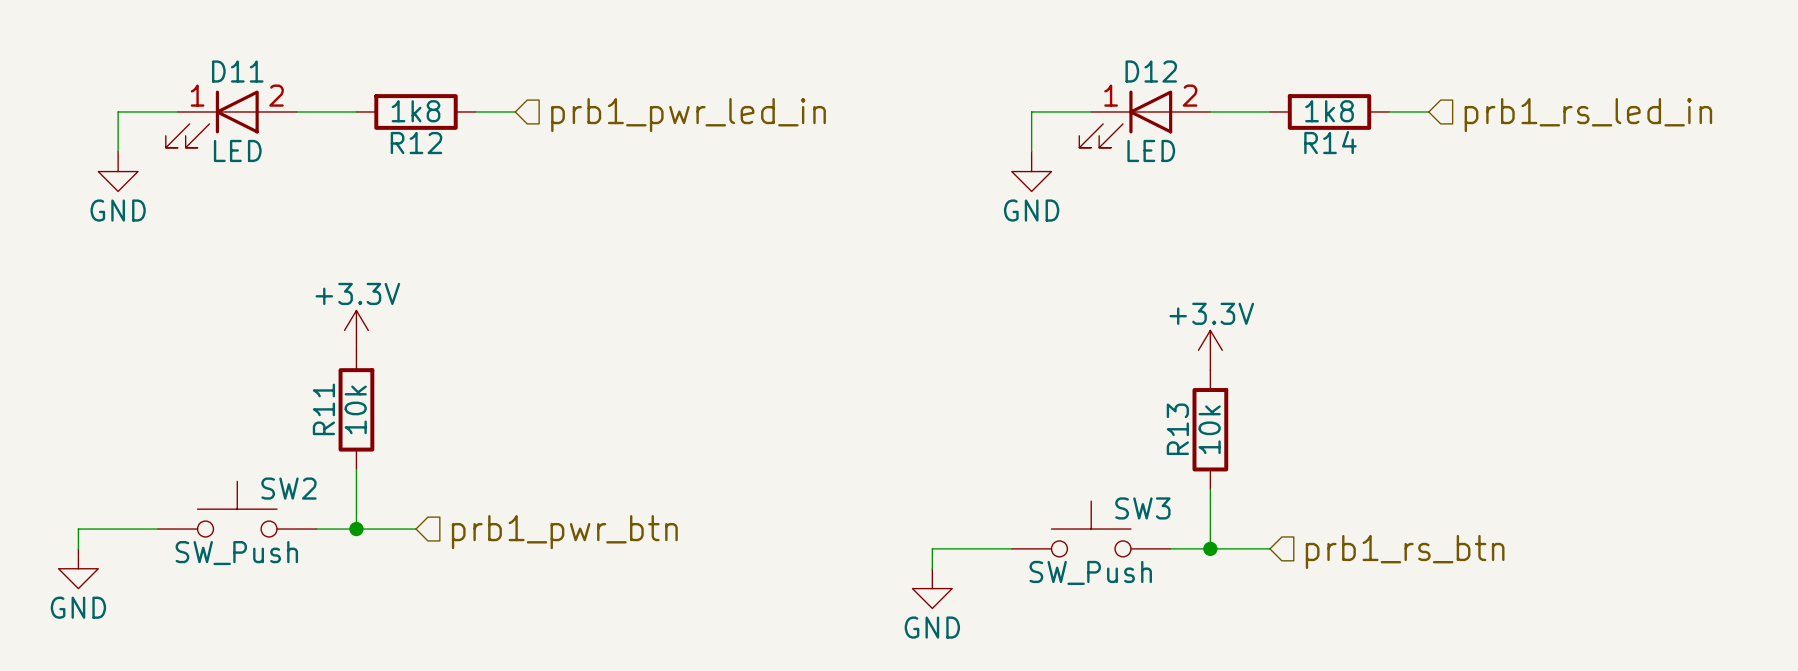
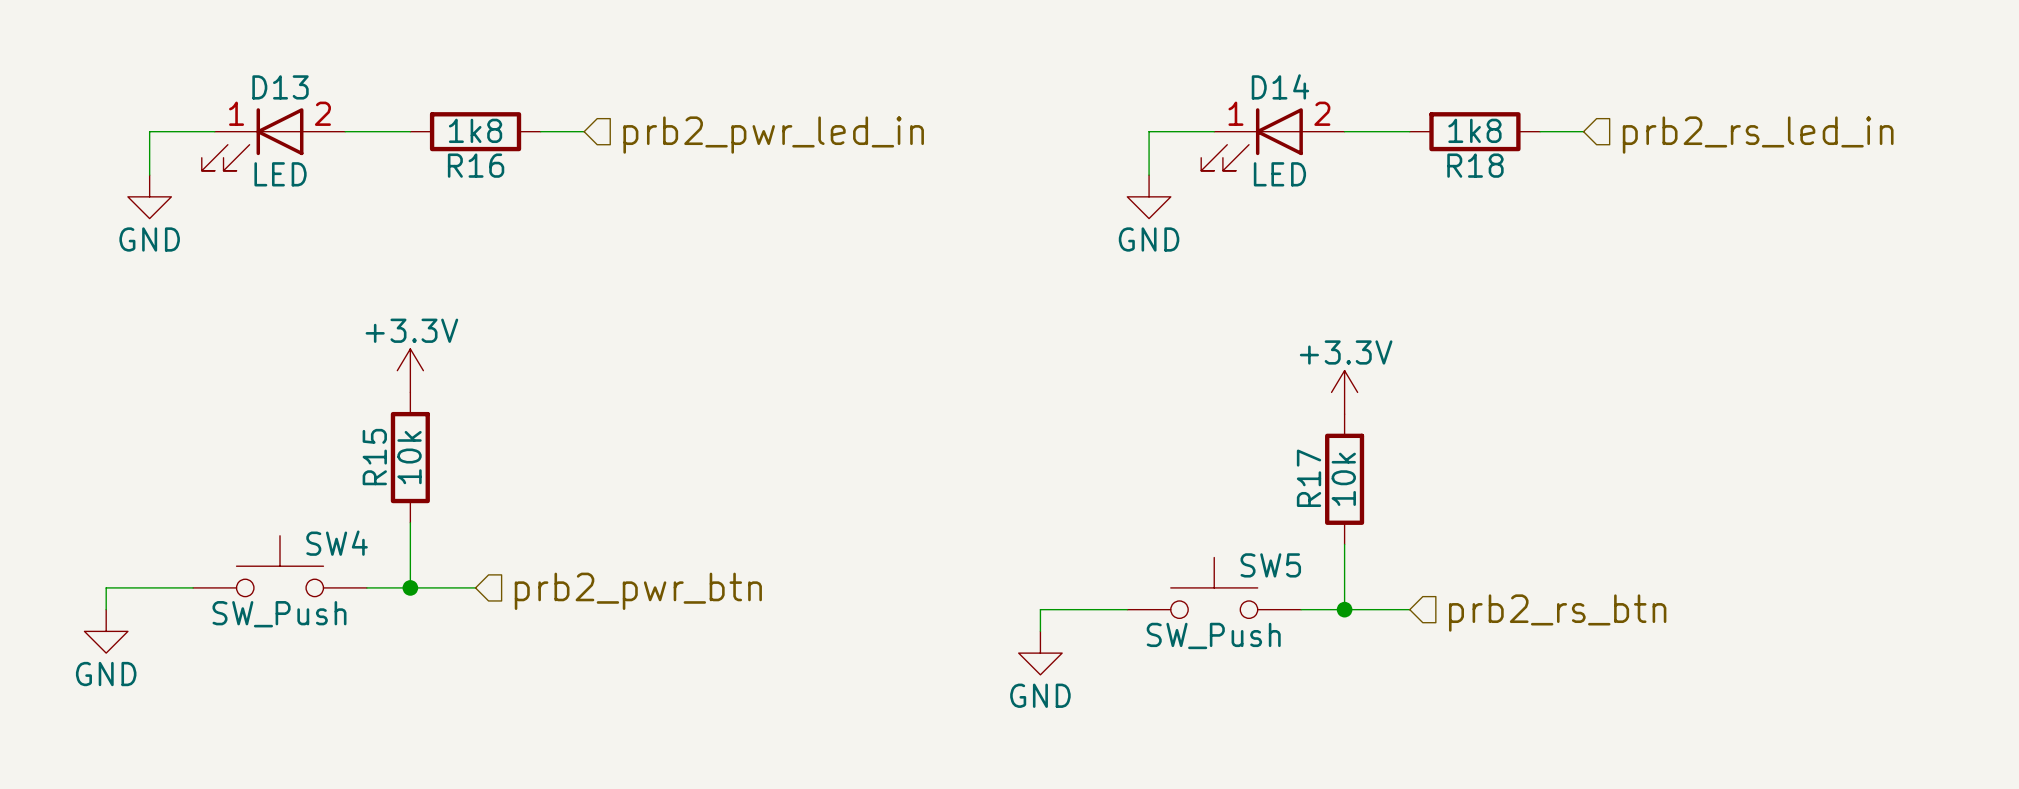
D11 name: D11 (237, 71) -> D13 (280, 87)
D12 name: D12 (1151, 71) -> D14 (1280, 86)
hierarchical label: prb1_pwr_led_in (688, 115) -> prb2_pwr_led_in (773, 135)
hierarchical label: prb1_rs_led_in (1588, 115) -> prb2_rs_led_in (1758, 135)
R14 name: R14 (1330, 142) -> R18 (1475, 165)
R12 name: R12 (416, 143) -> R16 (476, 165)
R11 name: R11 (323, 409) -> R15 (374, 457)
R13 name: R13 (1177, 429) -> R17 (1309, 478)
SW2 name: SW2 (288, 488) -> SW4 (337, 543)
SW3 name: SW3 (1142, 508) -> SW5 (1270, 565)
hierarchical label: prb1_pwr_btn (564, 532) -> prb2_pwr_btn (638, 591)
hierarchical label: prb1_rs_btn (1405, 551) -> prb2_rs_btn (1557, 613)

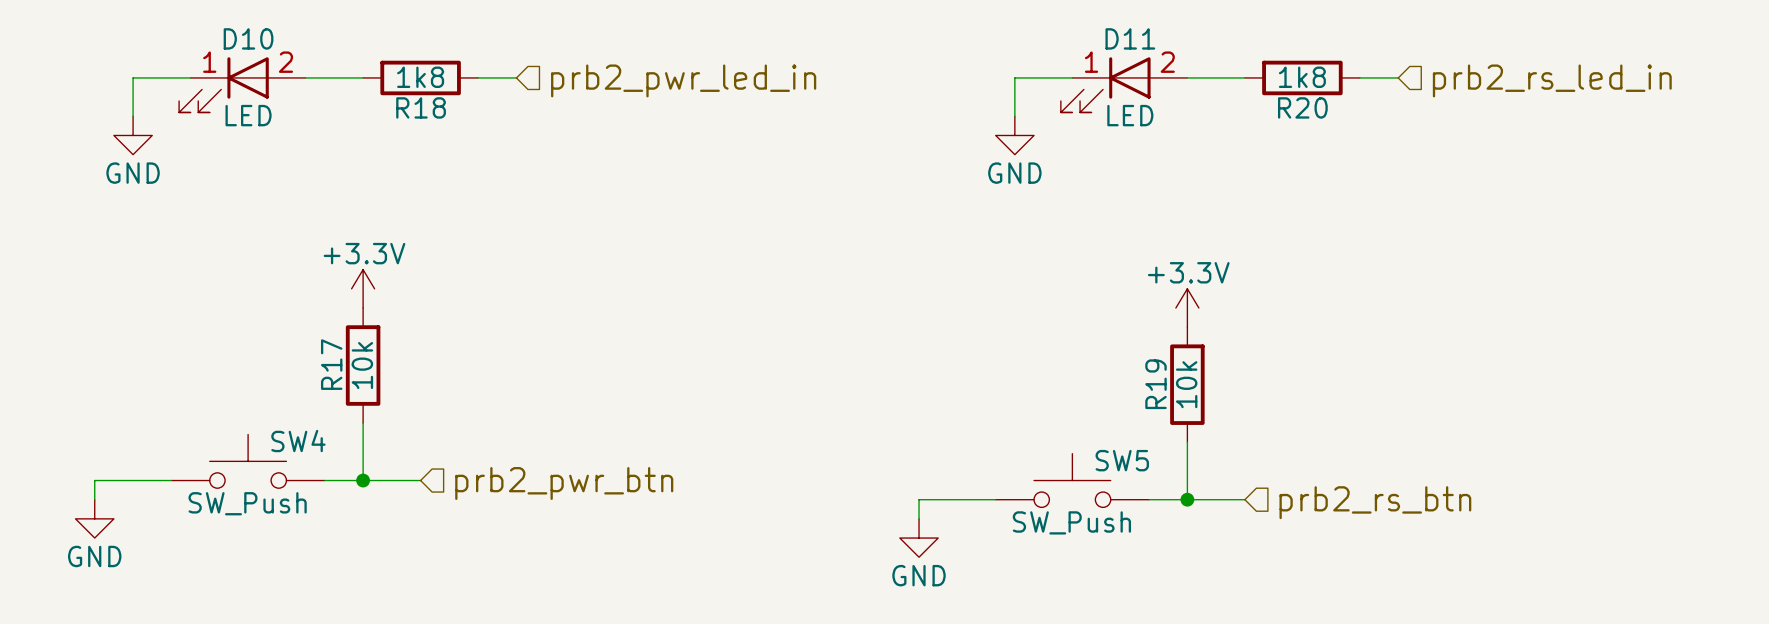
D14 name: D14 (1280, 86) -> D11 (1130, 38)
D13 name: D13 (280, 87) -> D10 (248, 38)
R16 name: R16 (476, 165) -> R18 (421, 107)
R18 name: R18 (1475, 165) -> R20 (1302, 107)
R15 name: R15 (374, 457) -> R17 (331, 364)
R17 name: R17 (1309, 478) -> R19 (1156, 384)

